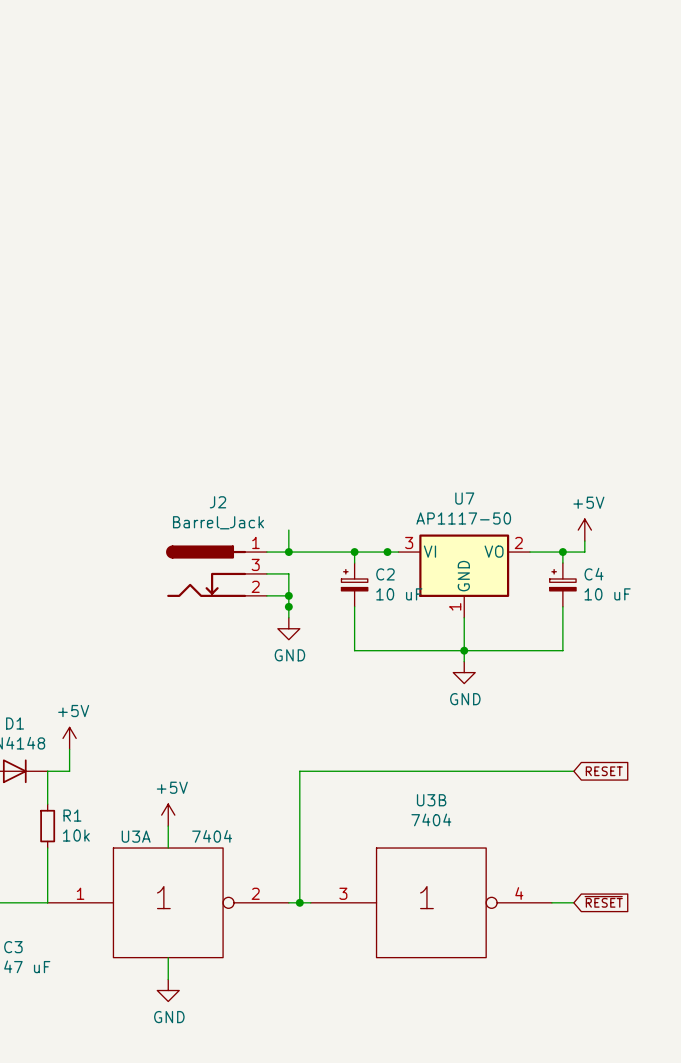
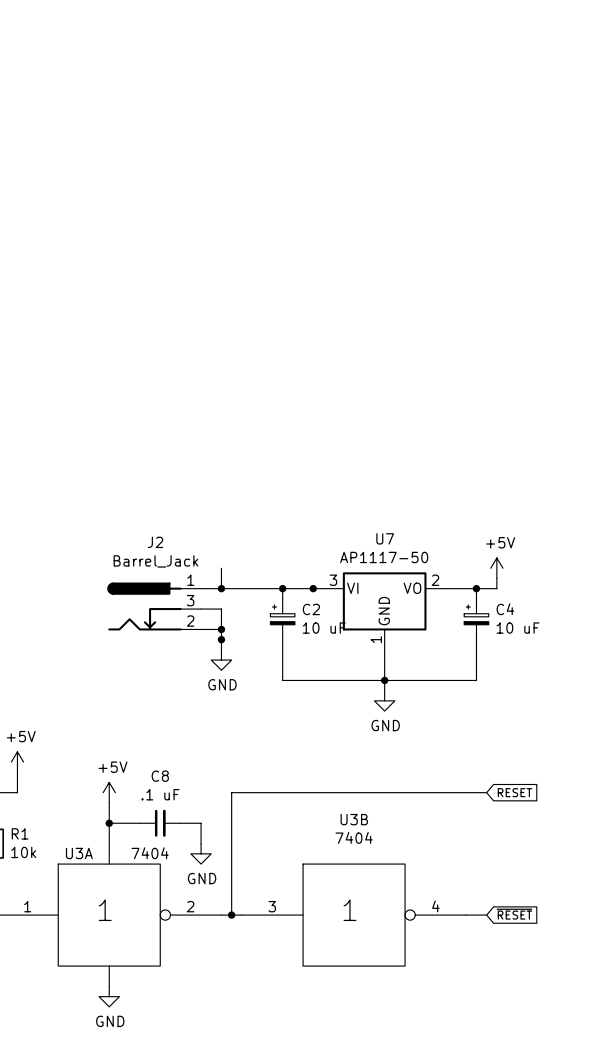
wire: none -> (109, 823) (139, 823)
junction: none -> (109, 823)
C8: none -> .1 uF (160, 823)
wire: none -> (180, 823) (201, 823) (201, 843)
power symbol position: +5V (168, 815) -> +5V (109, 792)
power symbol: none -> GND (201, 853)

